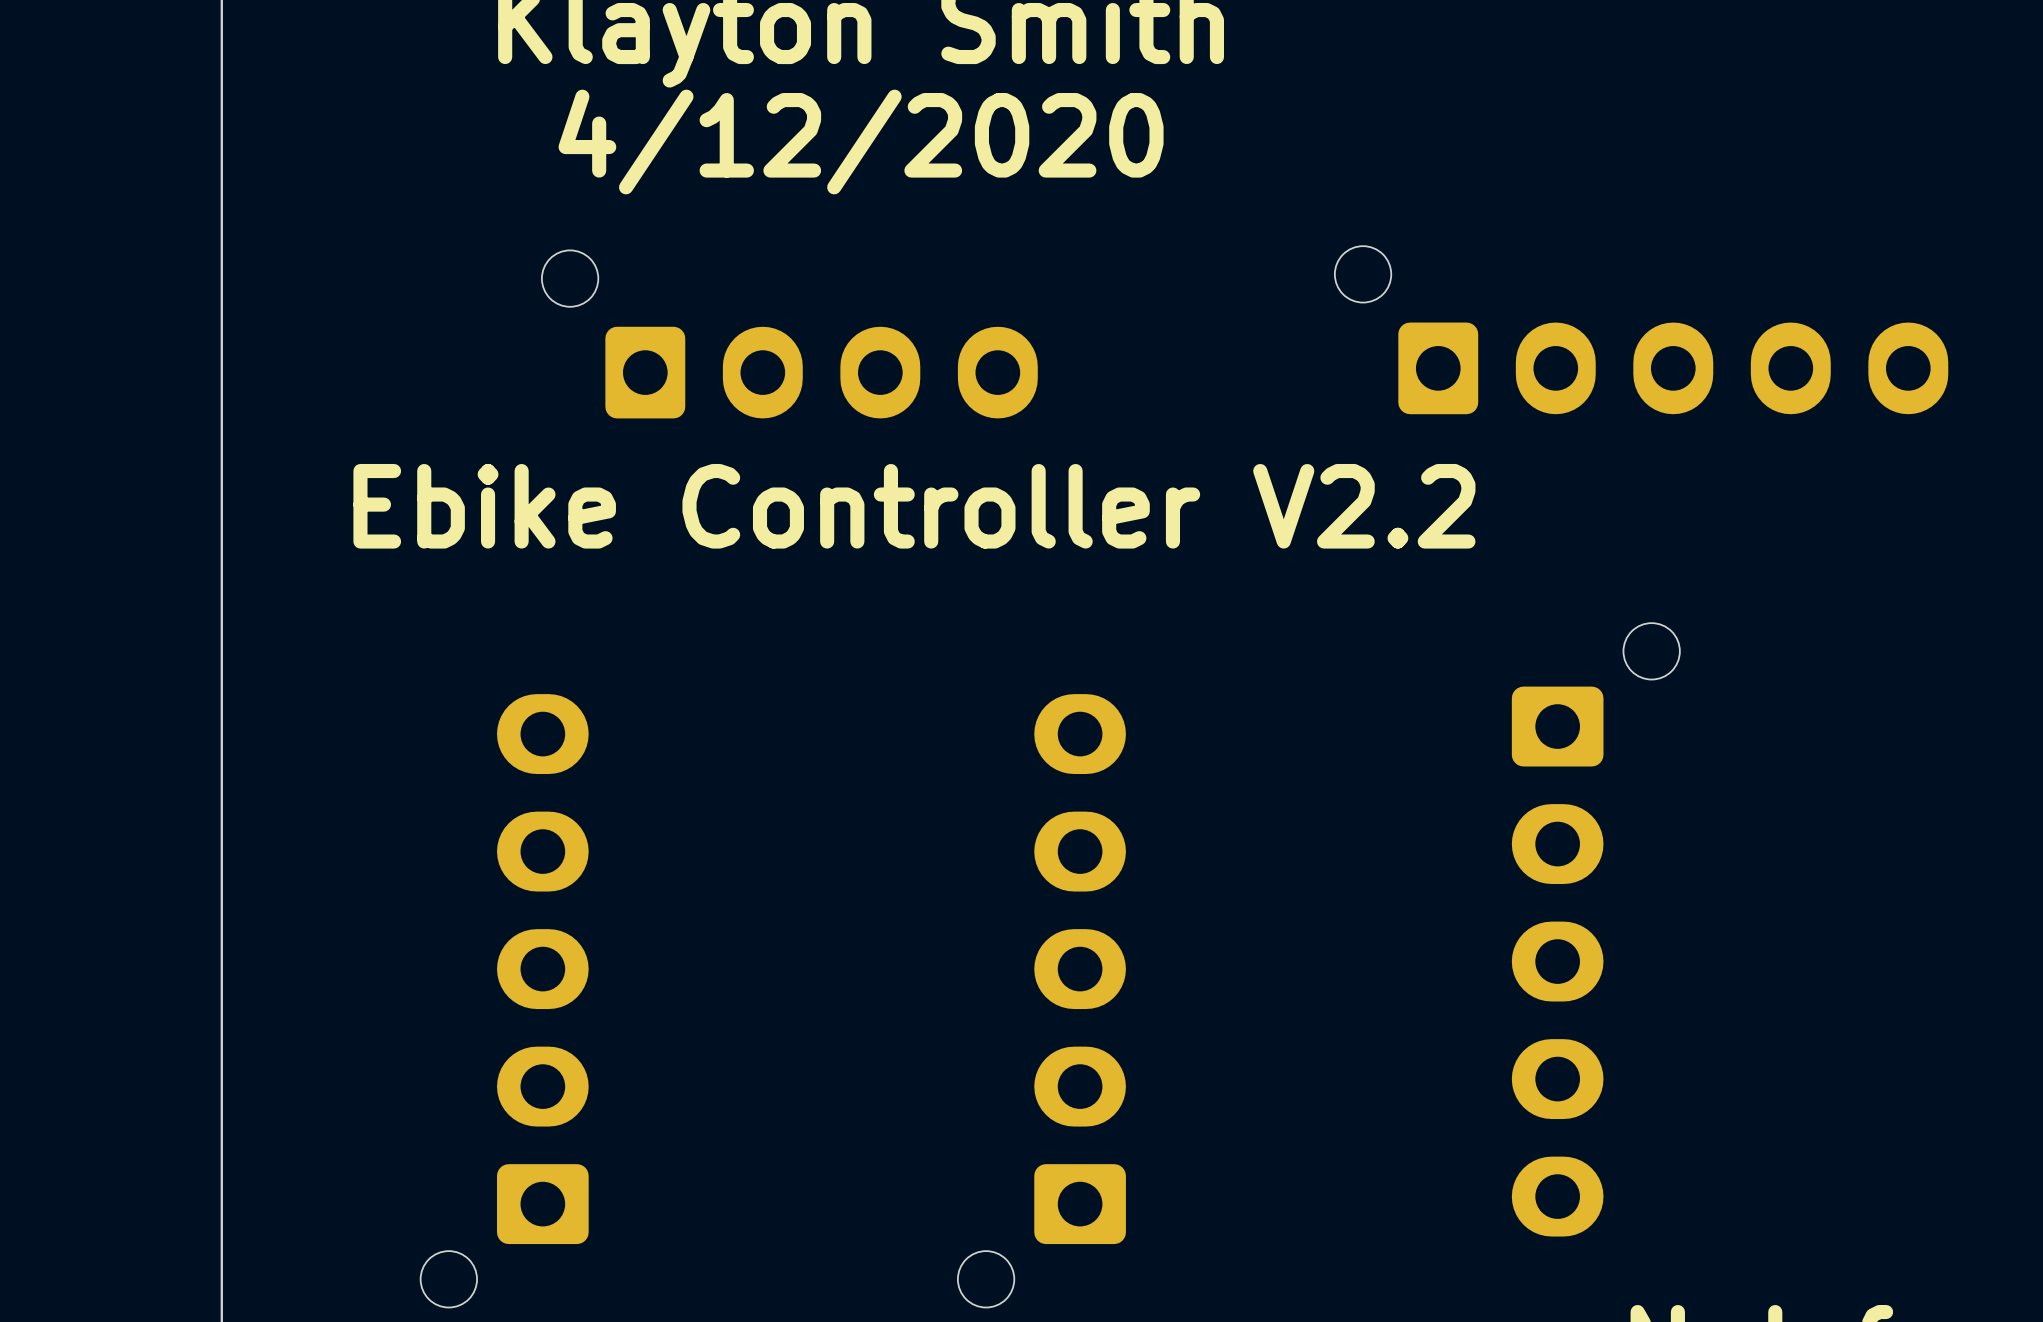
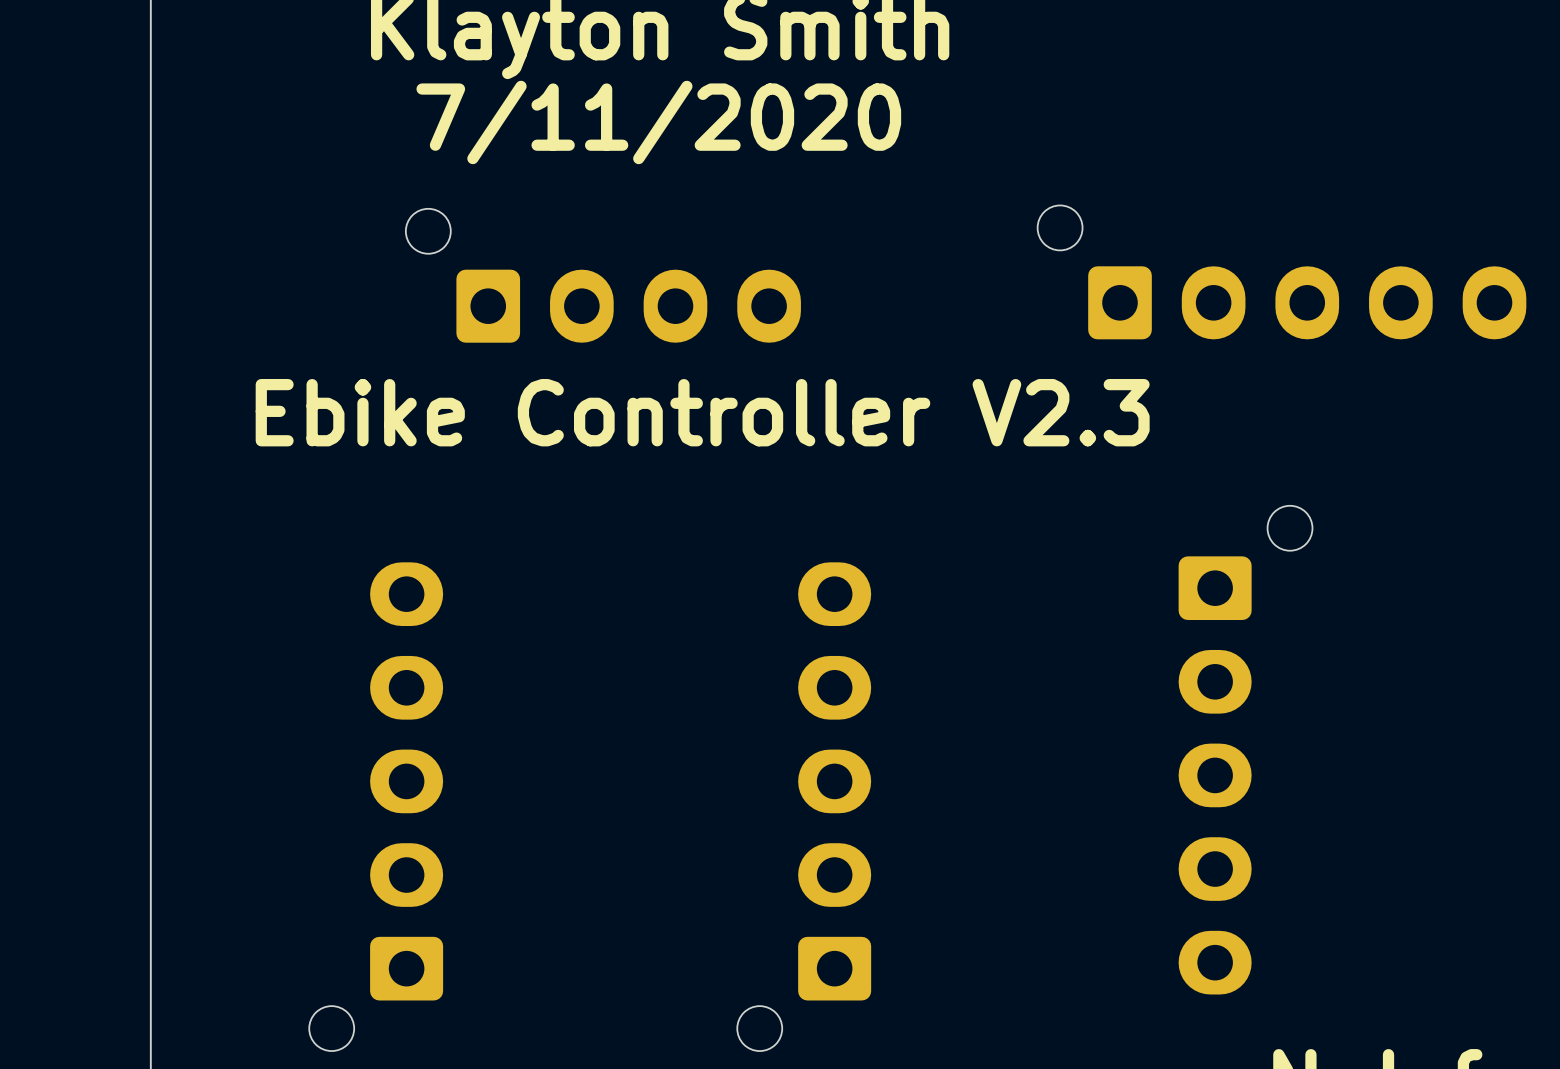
text: 4/12/2020 (861, 142) -> 7/11/2020 (658, 122)
text: Ebike Controller V2.2 (914, 506) -> Ebike Controller V2.3 (702, 412)

